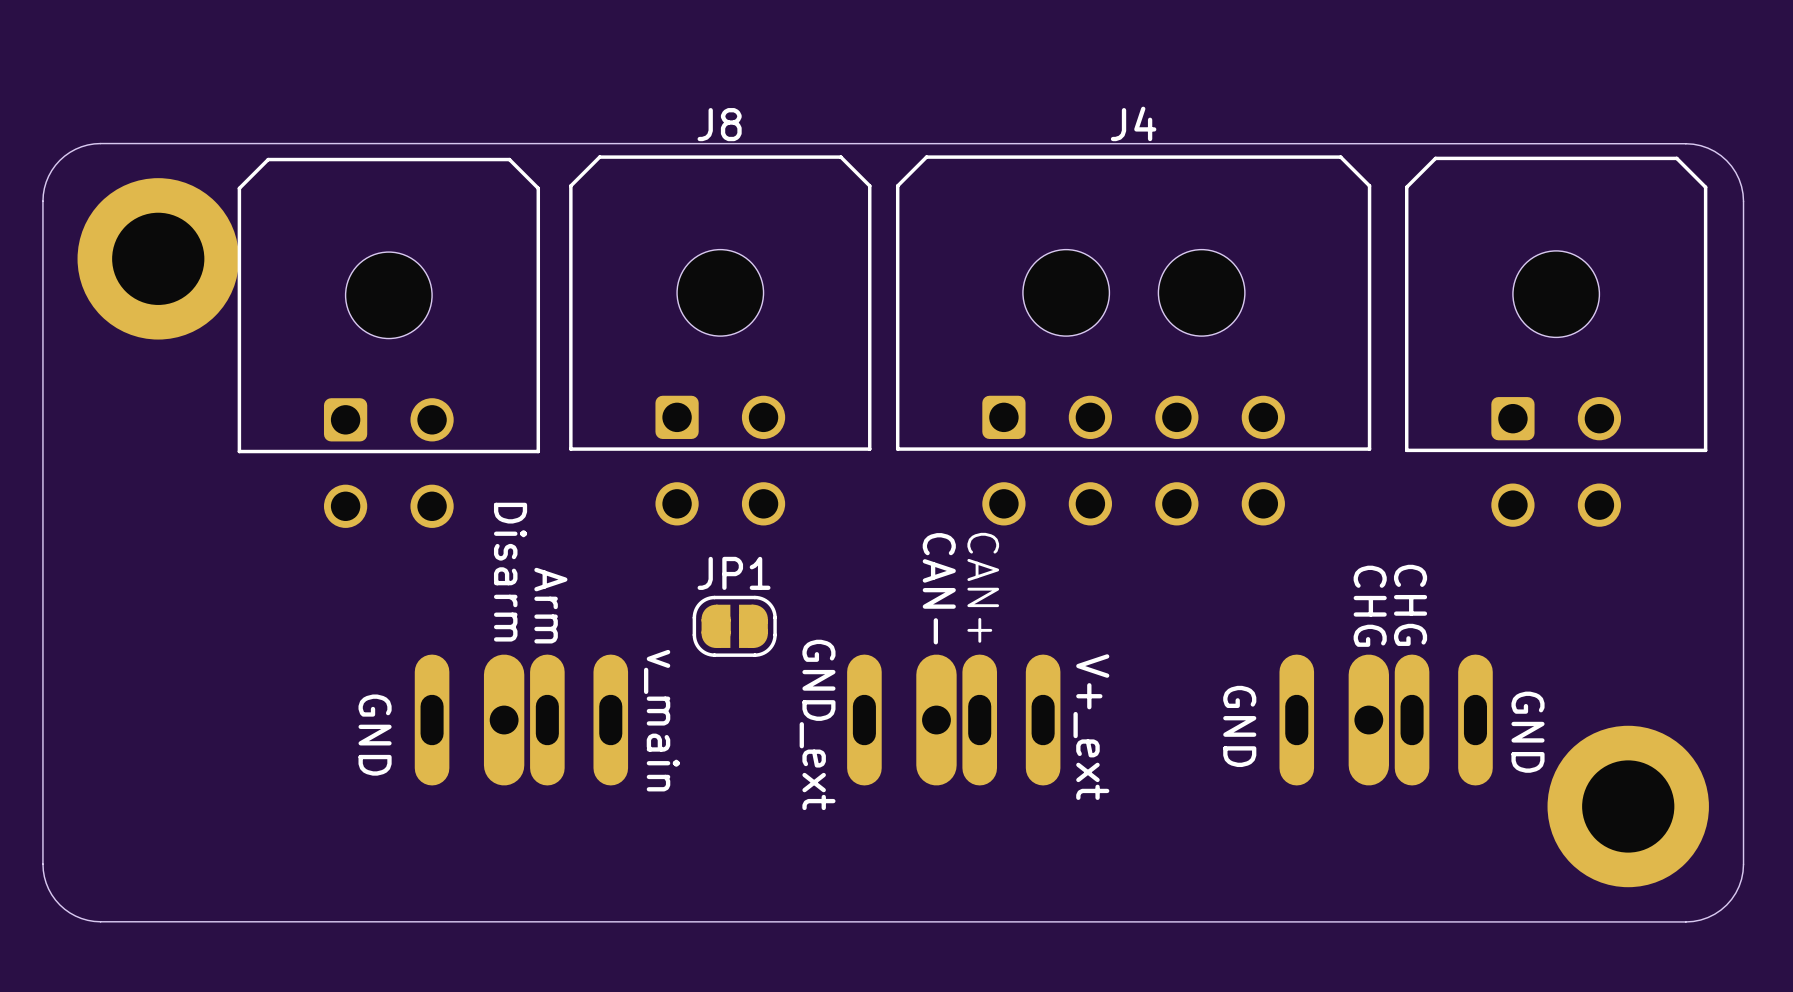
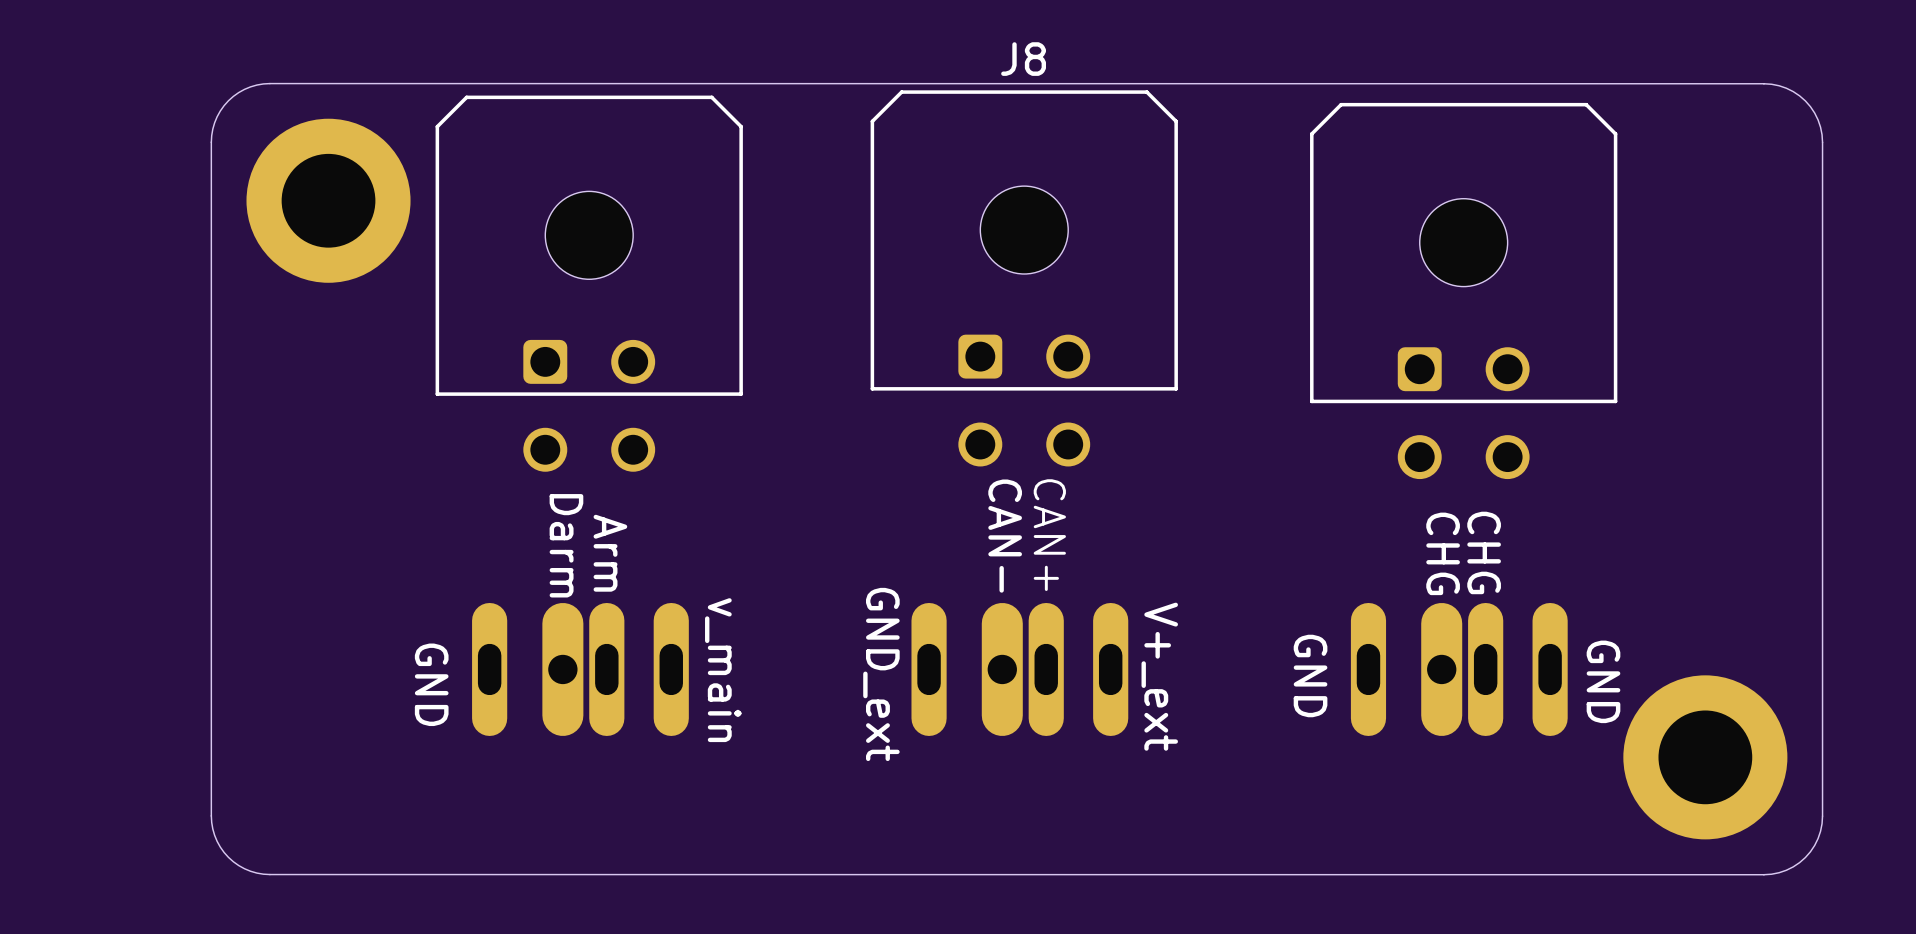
board edge: (215, 143) (100, 143) (81, 146) (64, 156) (51, 170) (44, 188) (42, 201) (44, 876) (48, 889) (59, 904) (75, 916) (87, 920) (215, 921) -> (269, 83) (250, 86) (228, 100) (214, 122) (211, 142) (211, 822) (217, 841) (233, 861) (250, 871) (269, 874)
part position: (158, 258) -> (328, 200)
J8 position: (720, 340) -> (1024, 278)
J4: (1133, 340) -> none
part position: (1556, 341) -> (1463, 290)
part position: (388, 342) -> (589, 283)
text: Disarm (510, 572) -> Darm (566, 545)
JP1: (734, 626) -> none

